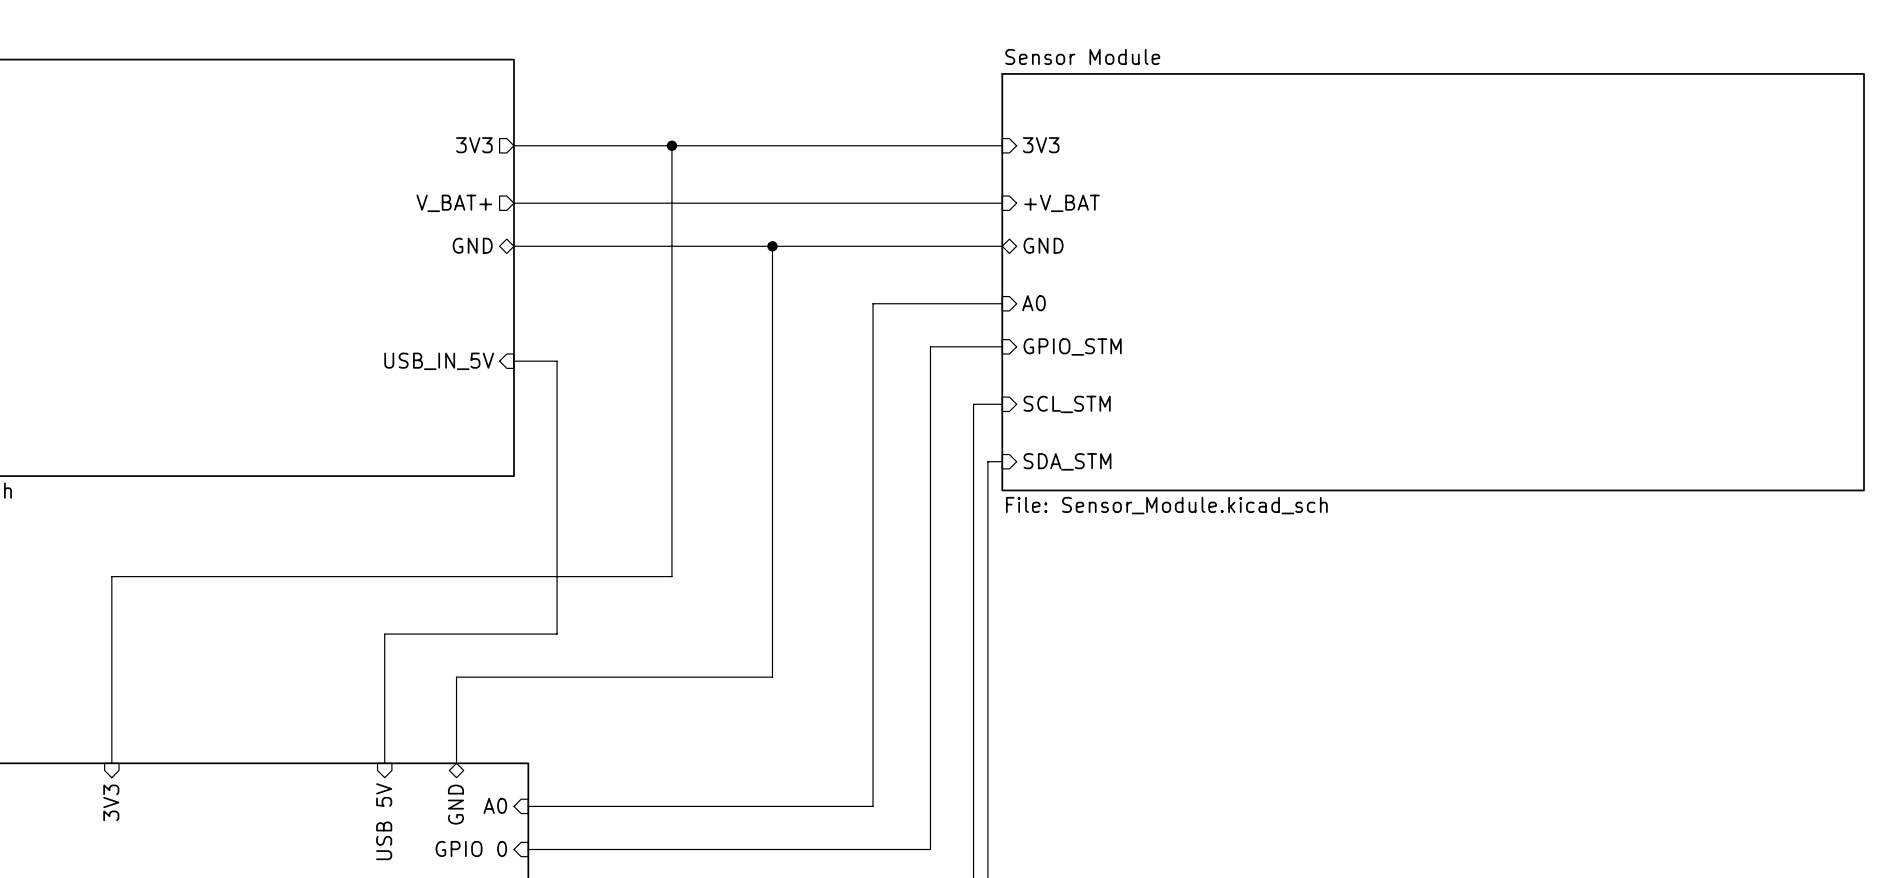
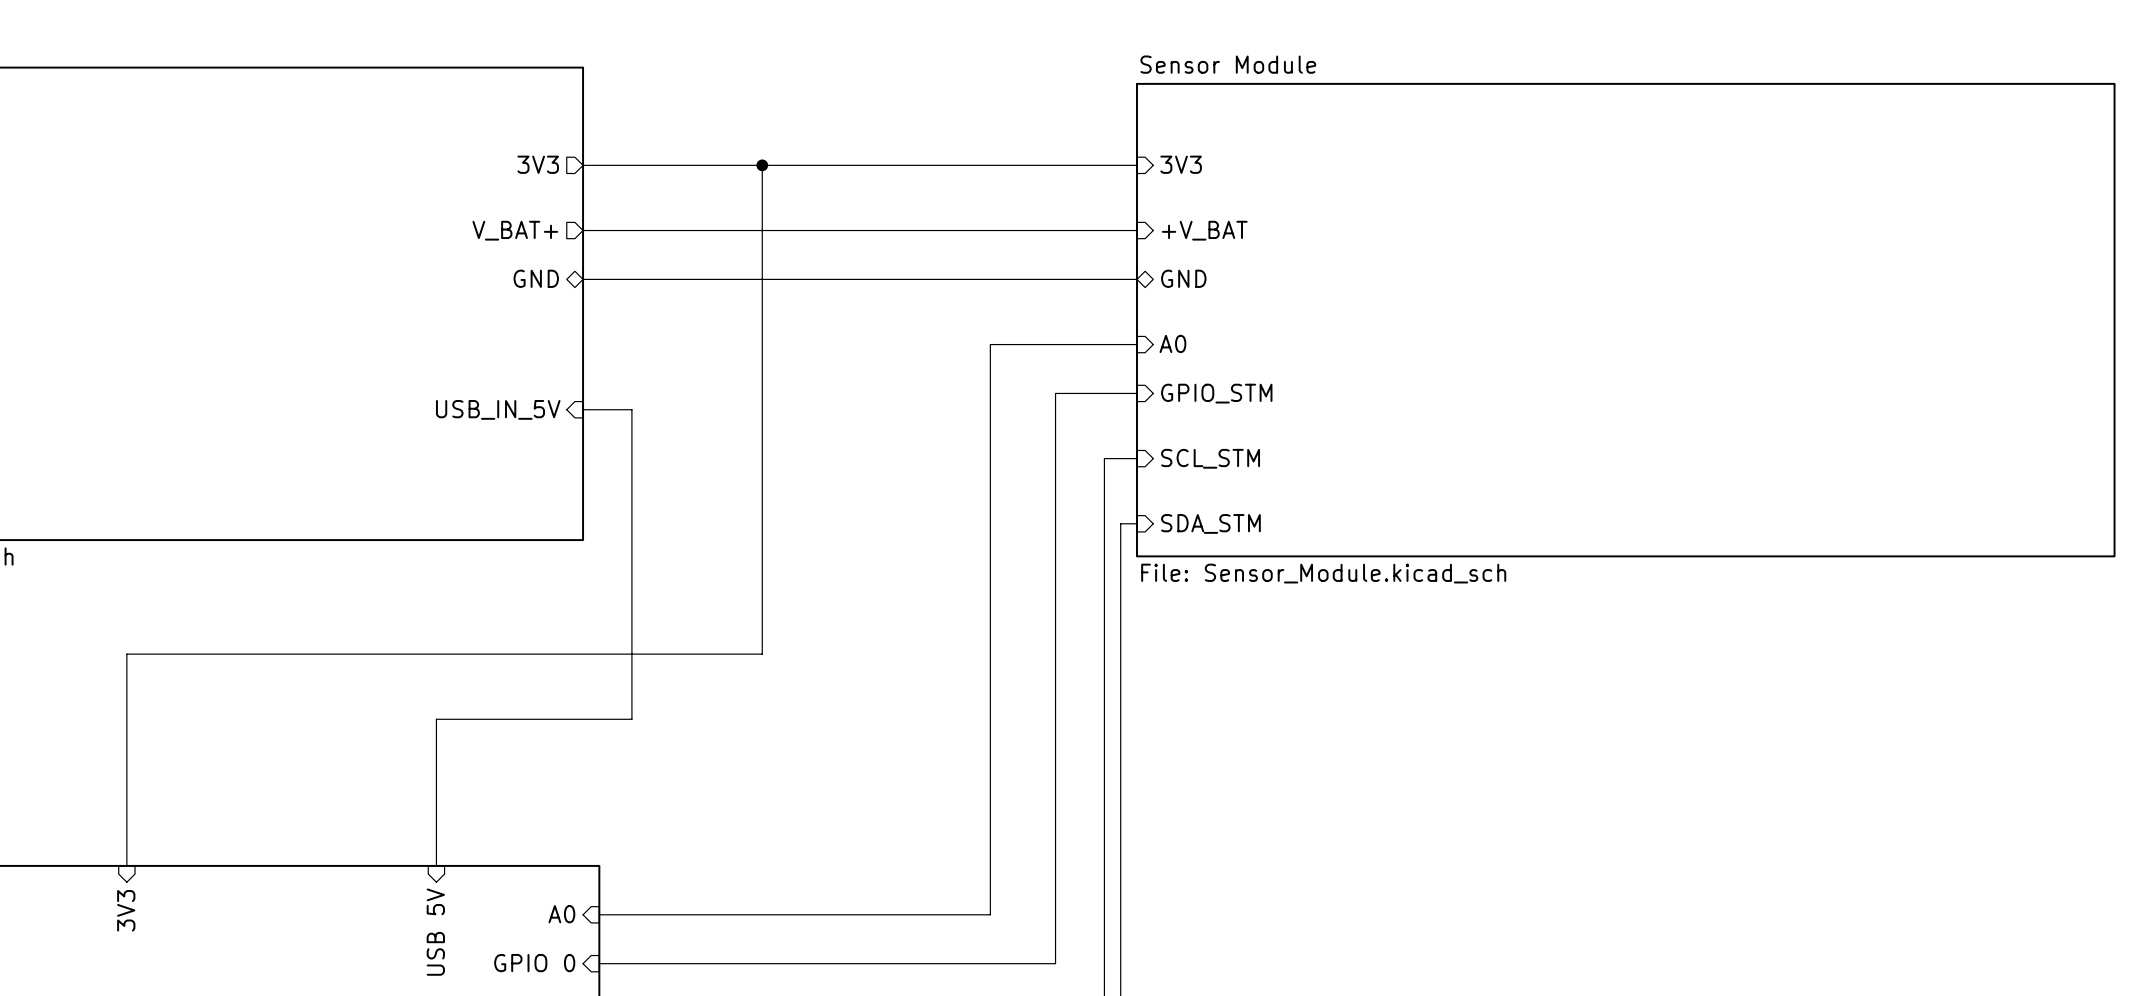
wire: (772, 246) (772, 677) (456, 677) (456, 763) -> none
junction: (772, 246) -> none
sheet pin: GND (455, 804) -> none

